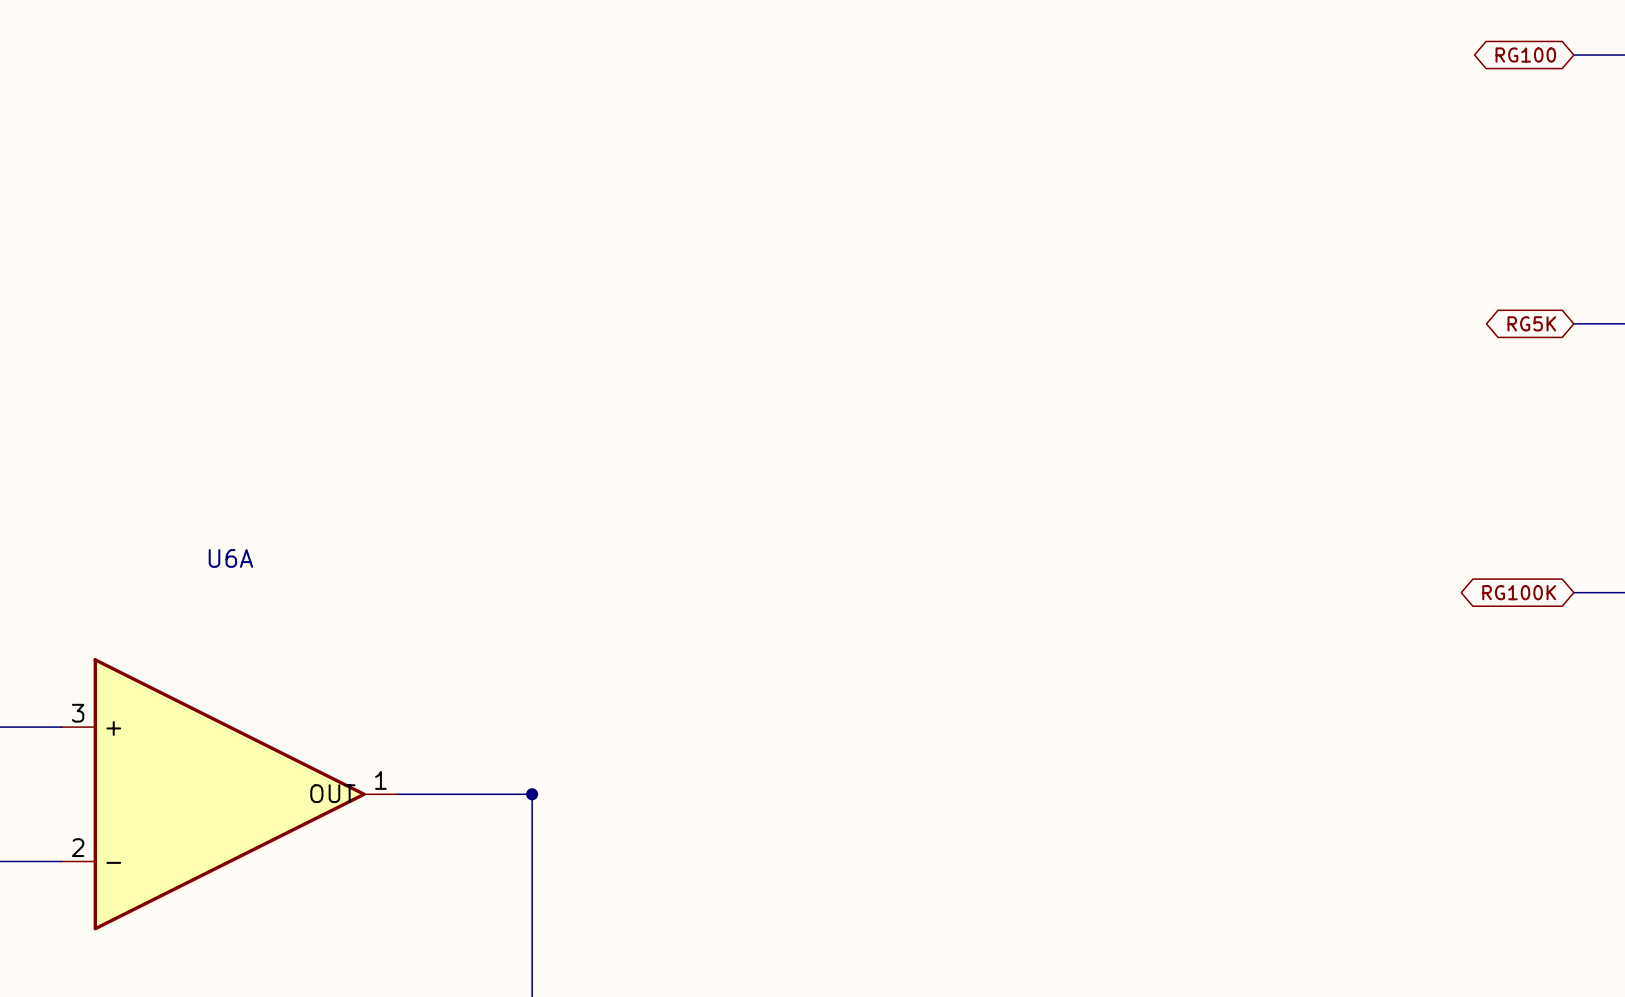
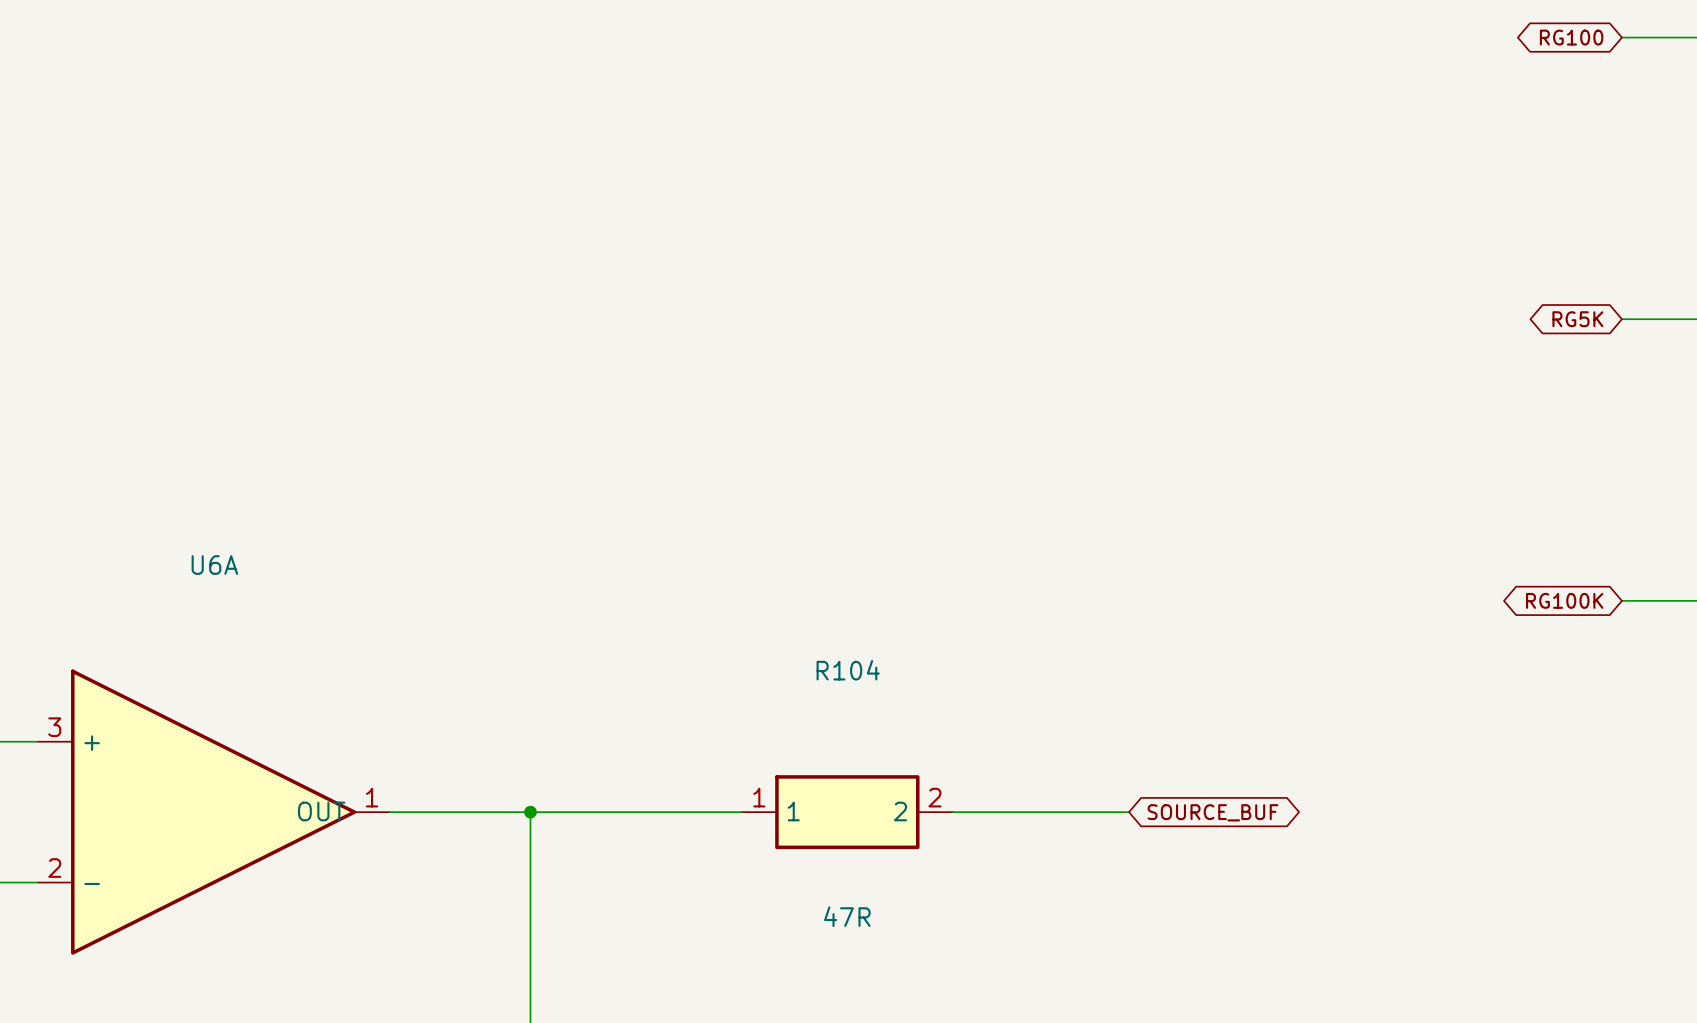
wire: none -> (530, 812) (741, 812)
R104: none -> 47R (847, 812)
wire: none -> (952, 812) (1129, 812)
global label: none -> SOURCE_BUF (1212, 812)

